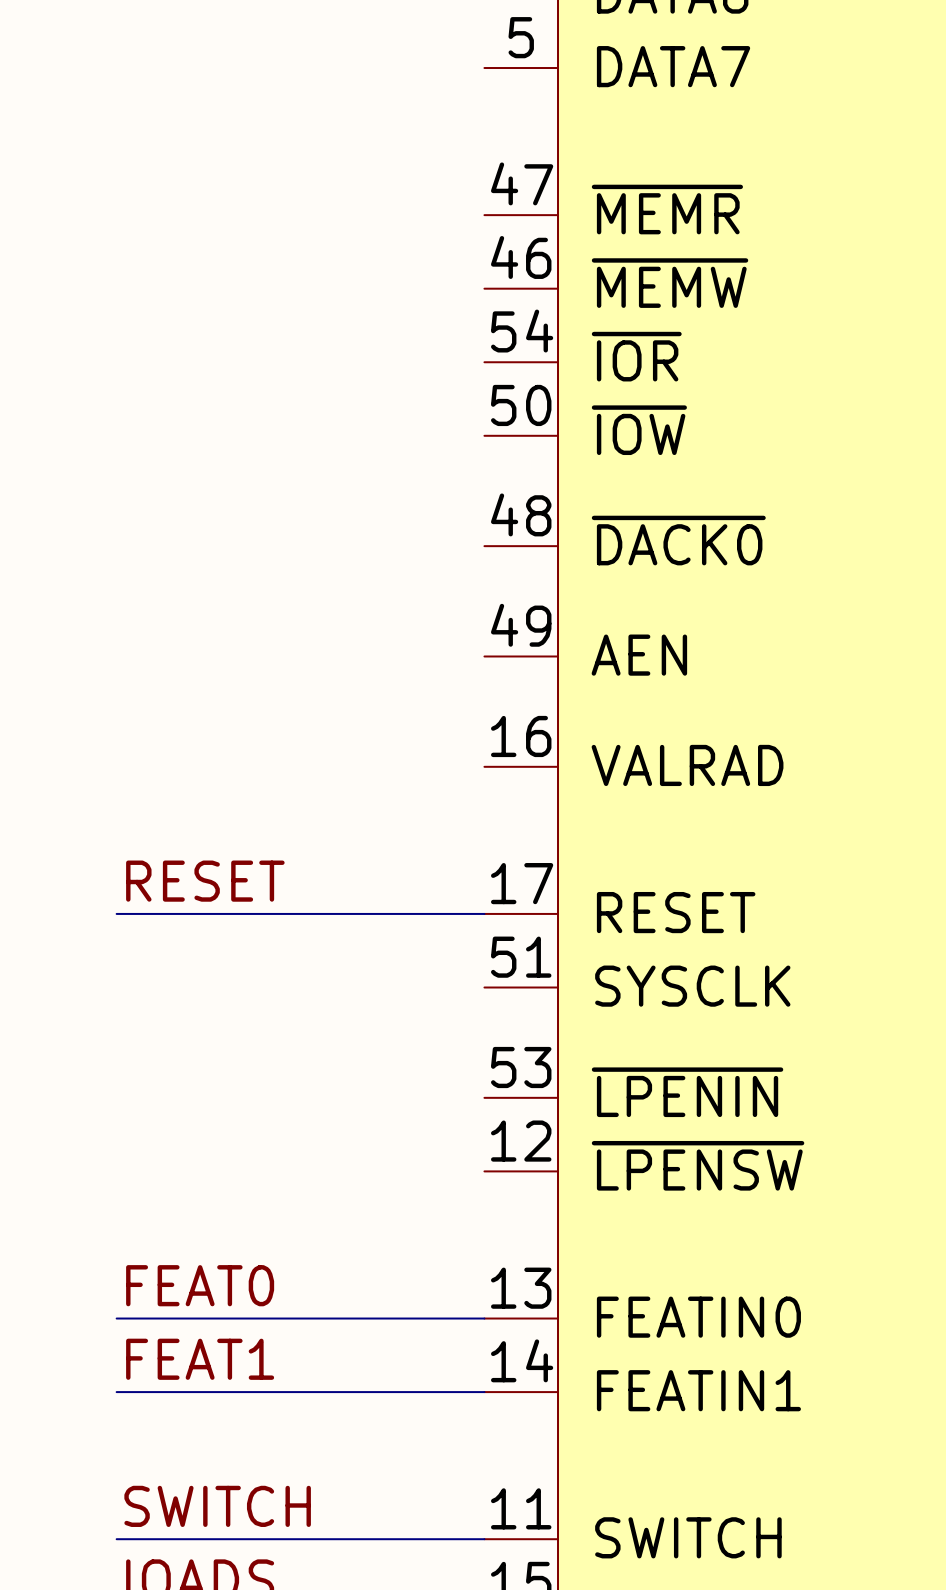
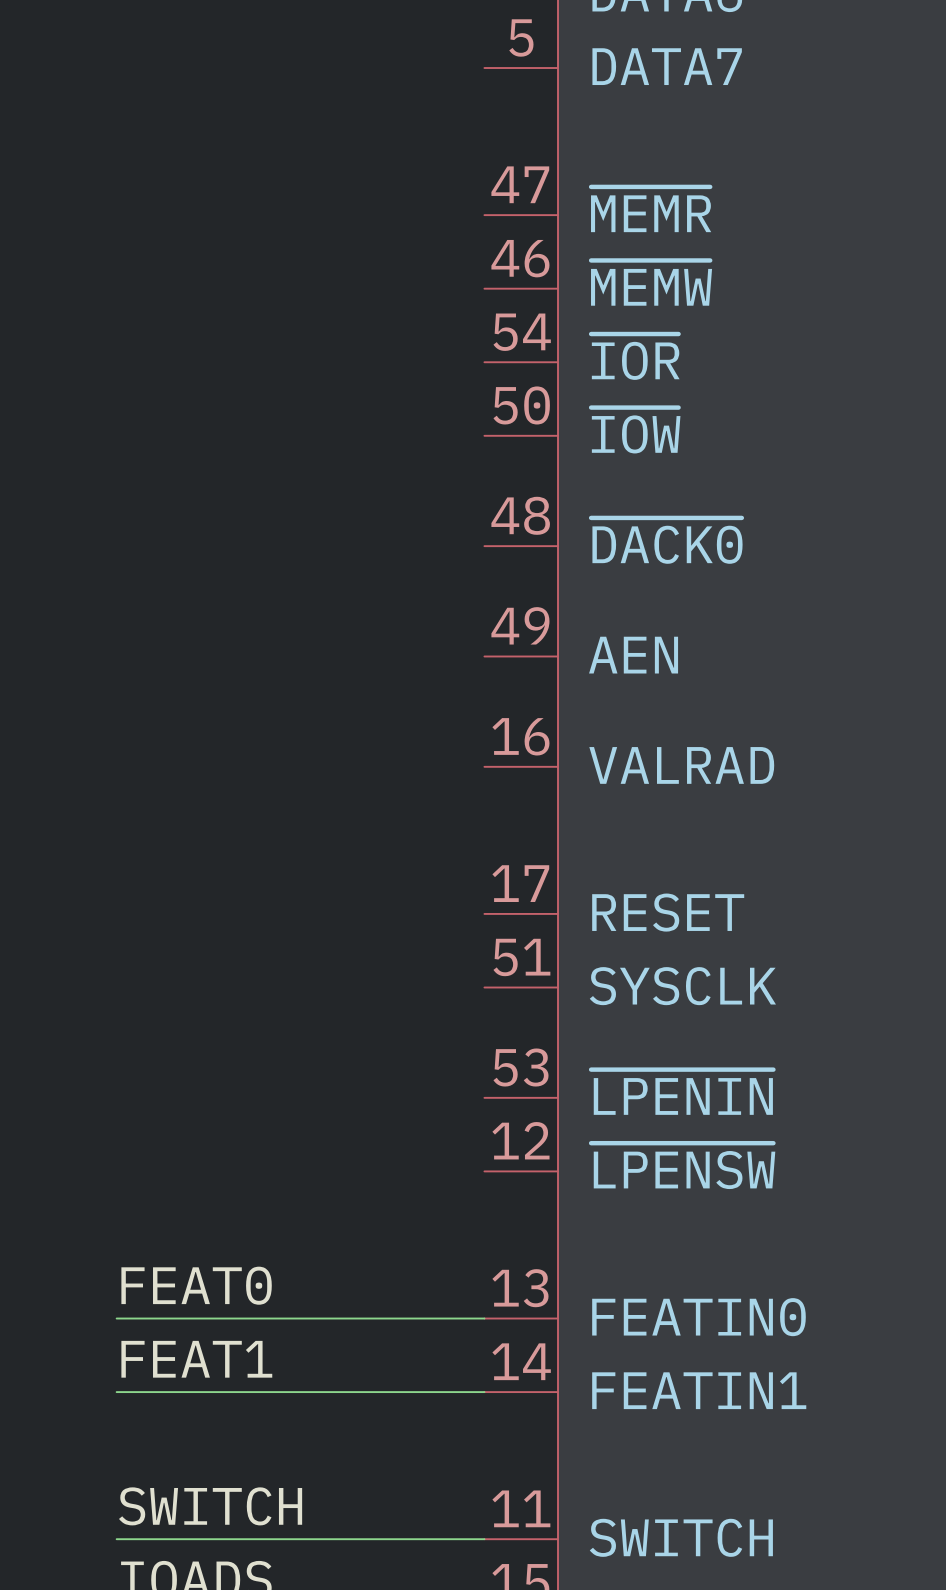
label: RESET (205, 881) -> none
wire: (116, 913) (484, 913) -> none

